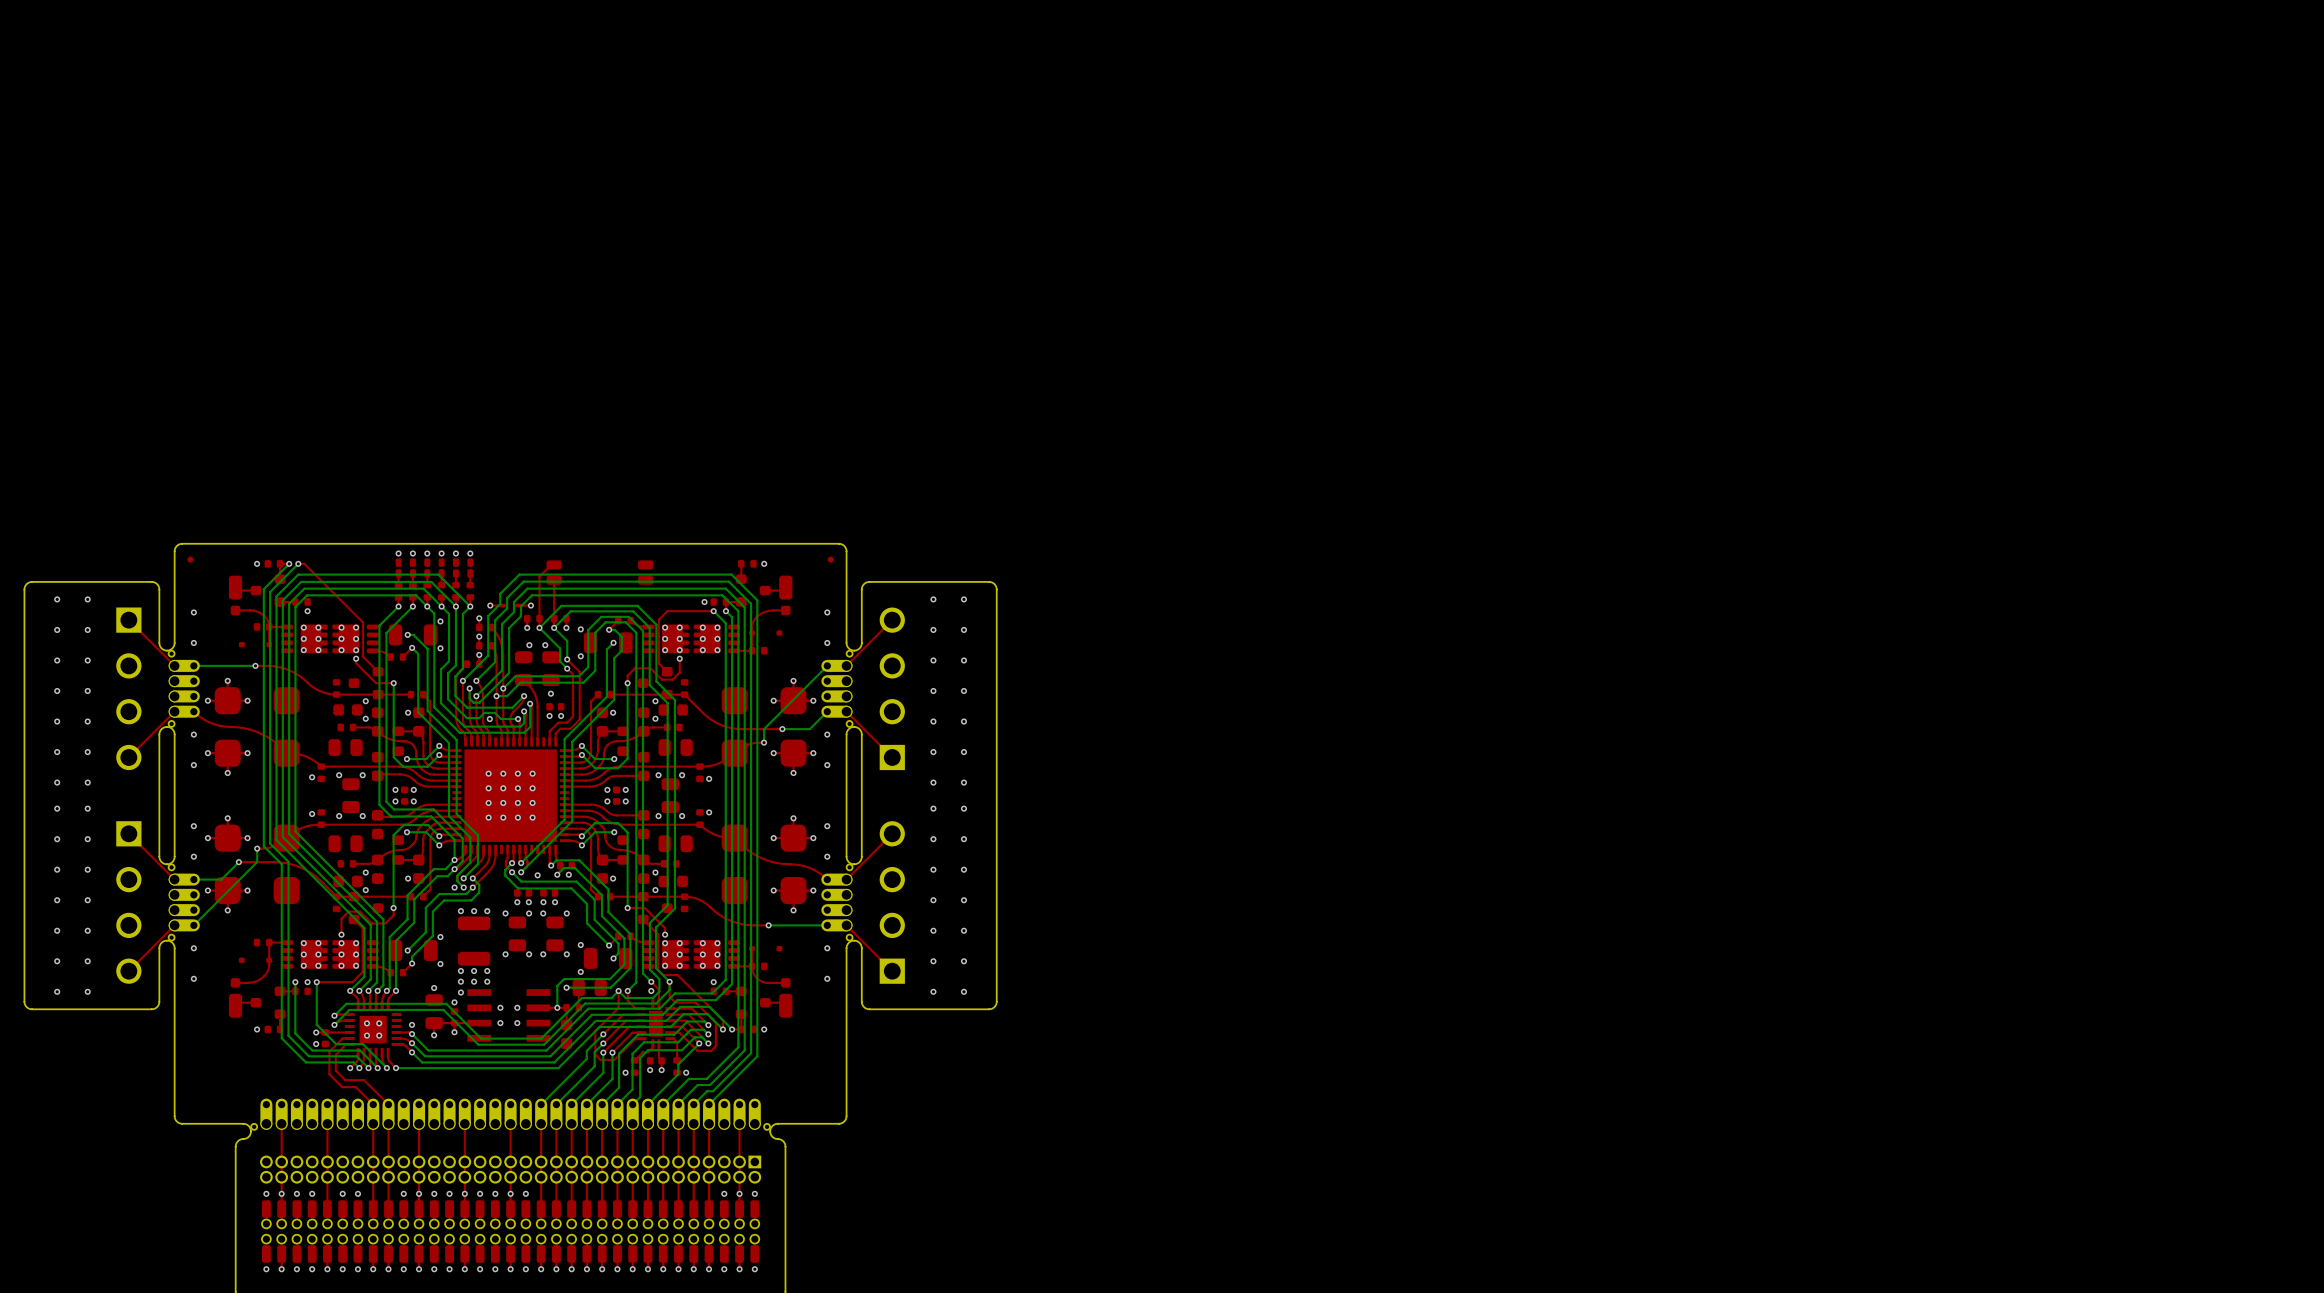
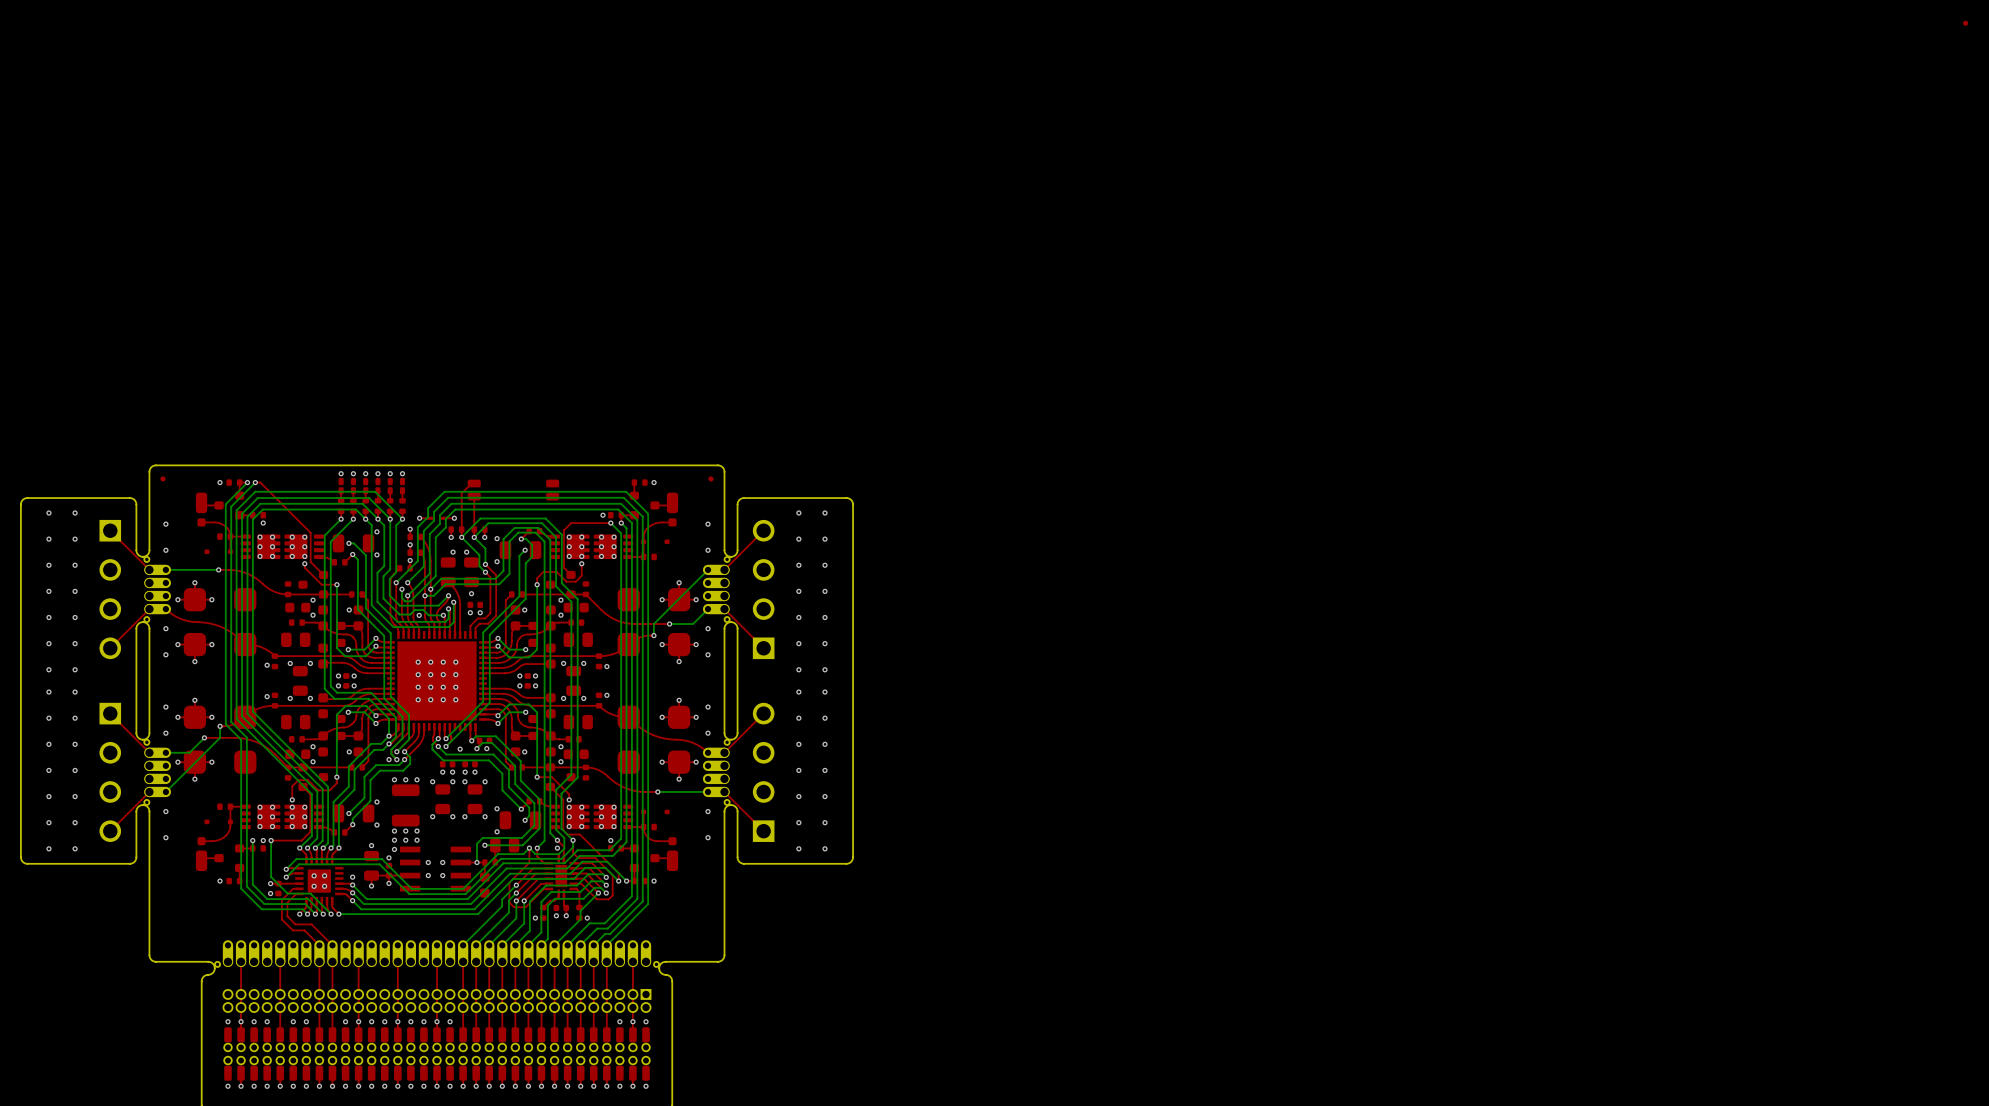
part: none -> (1965, 23)

